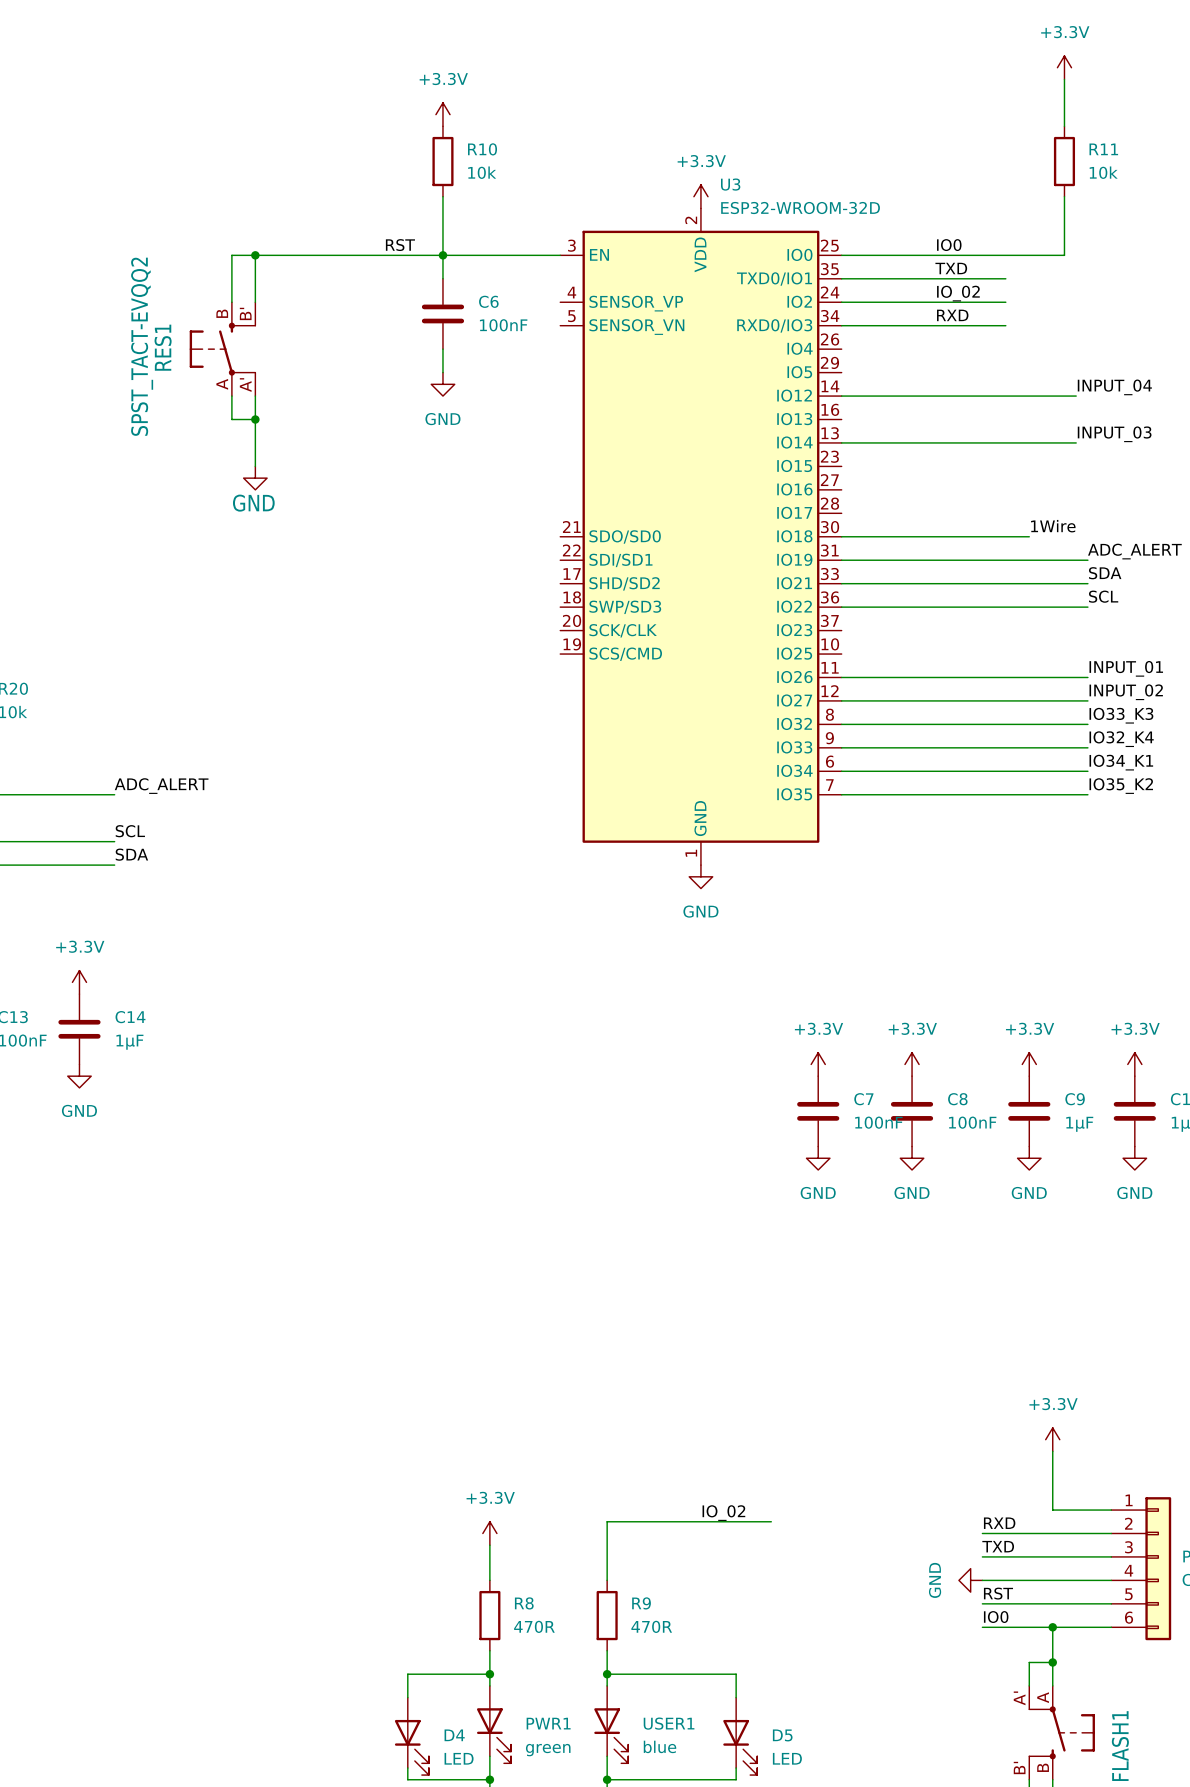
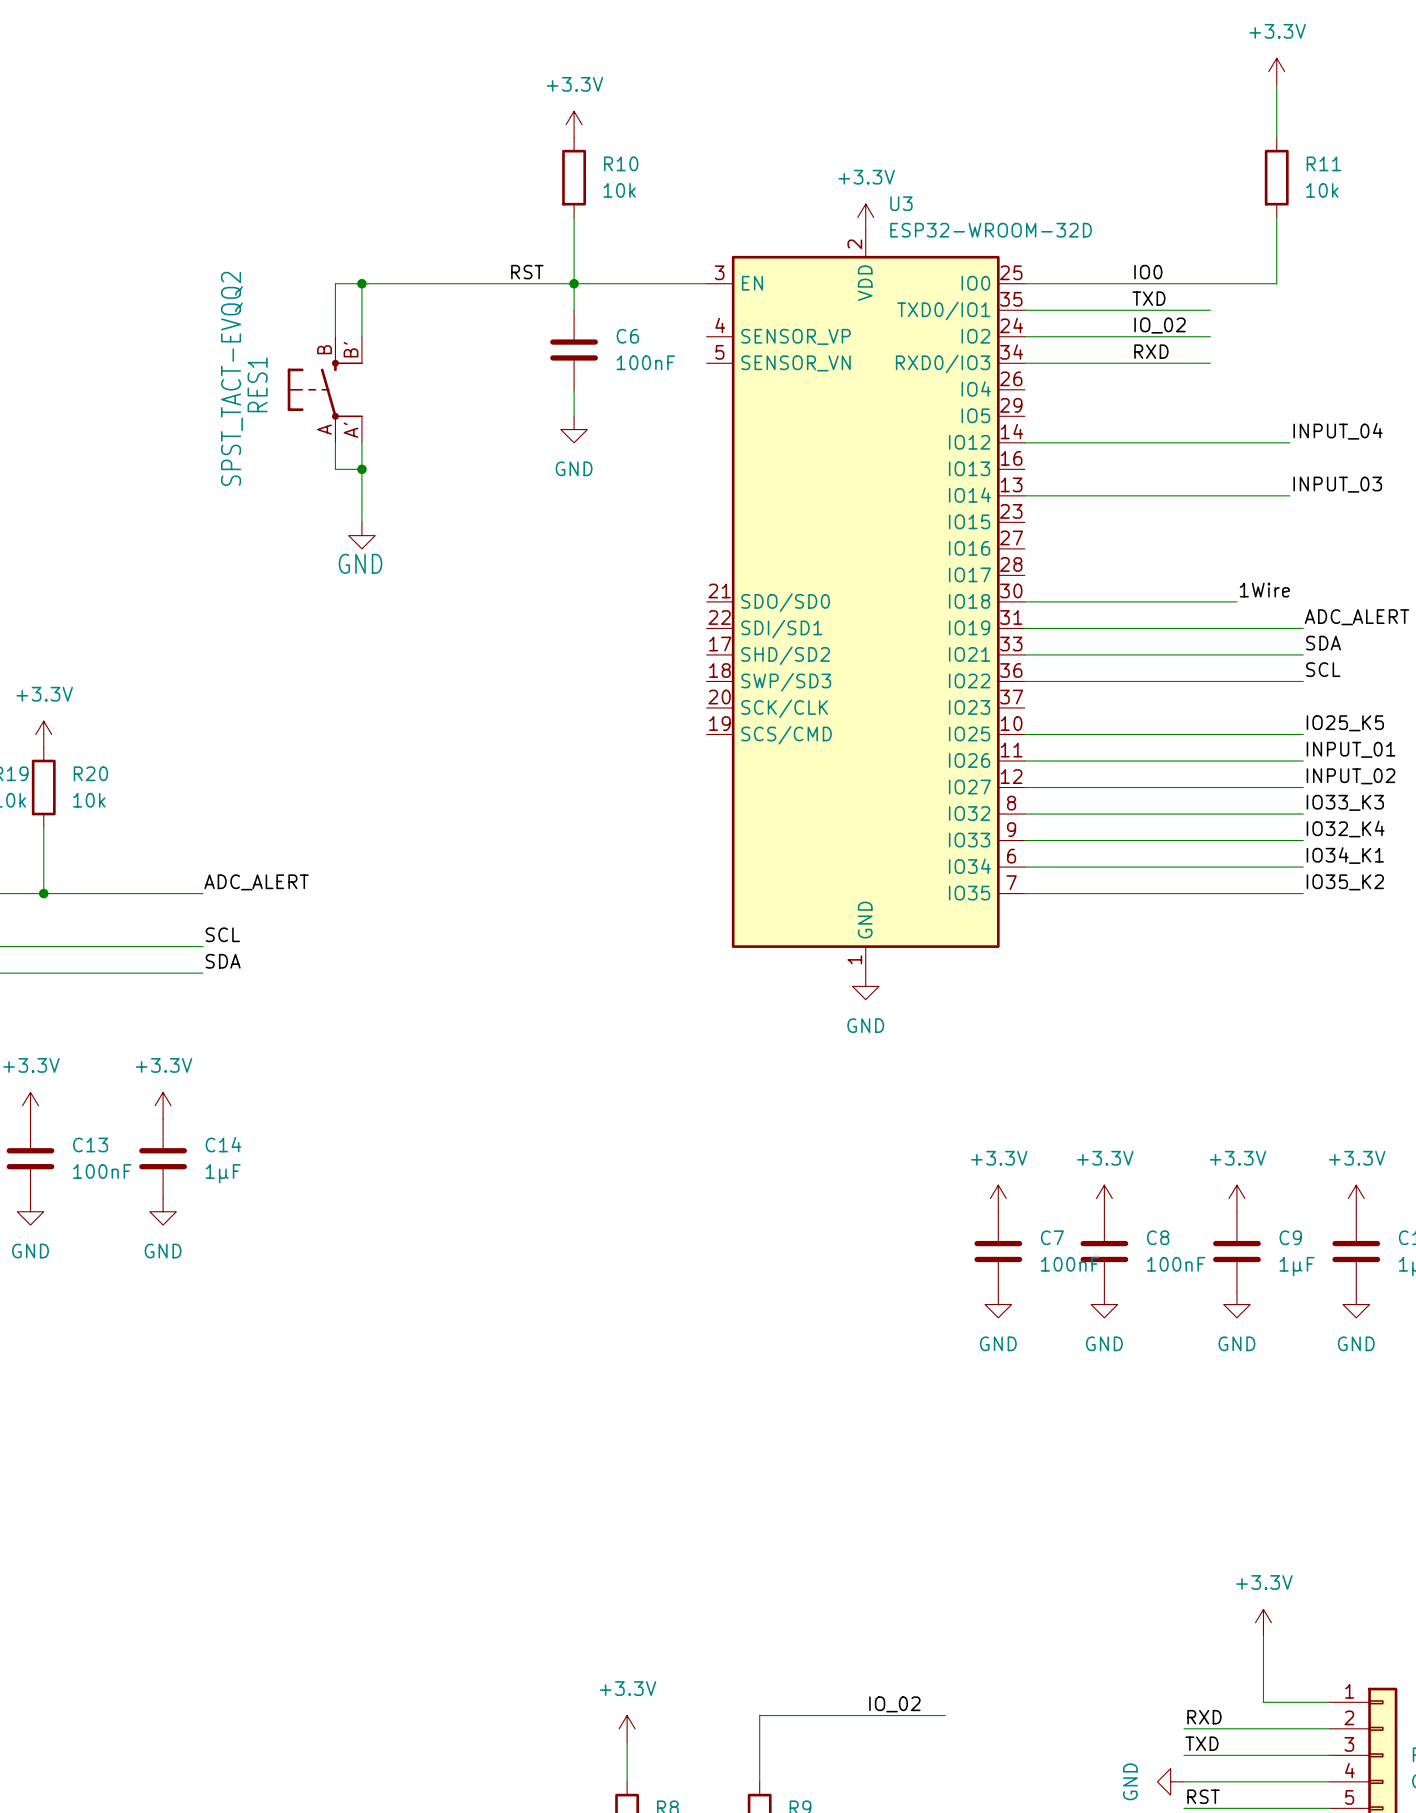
label: none -> IO25_K5 (1345, 723)
wire: none -> (1024, 734) (1303, 734)

